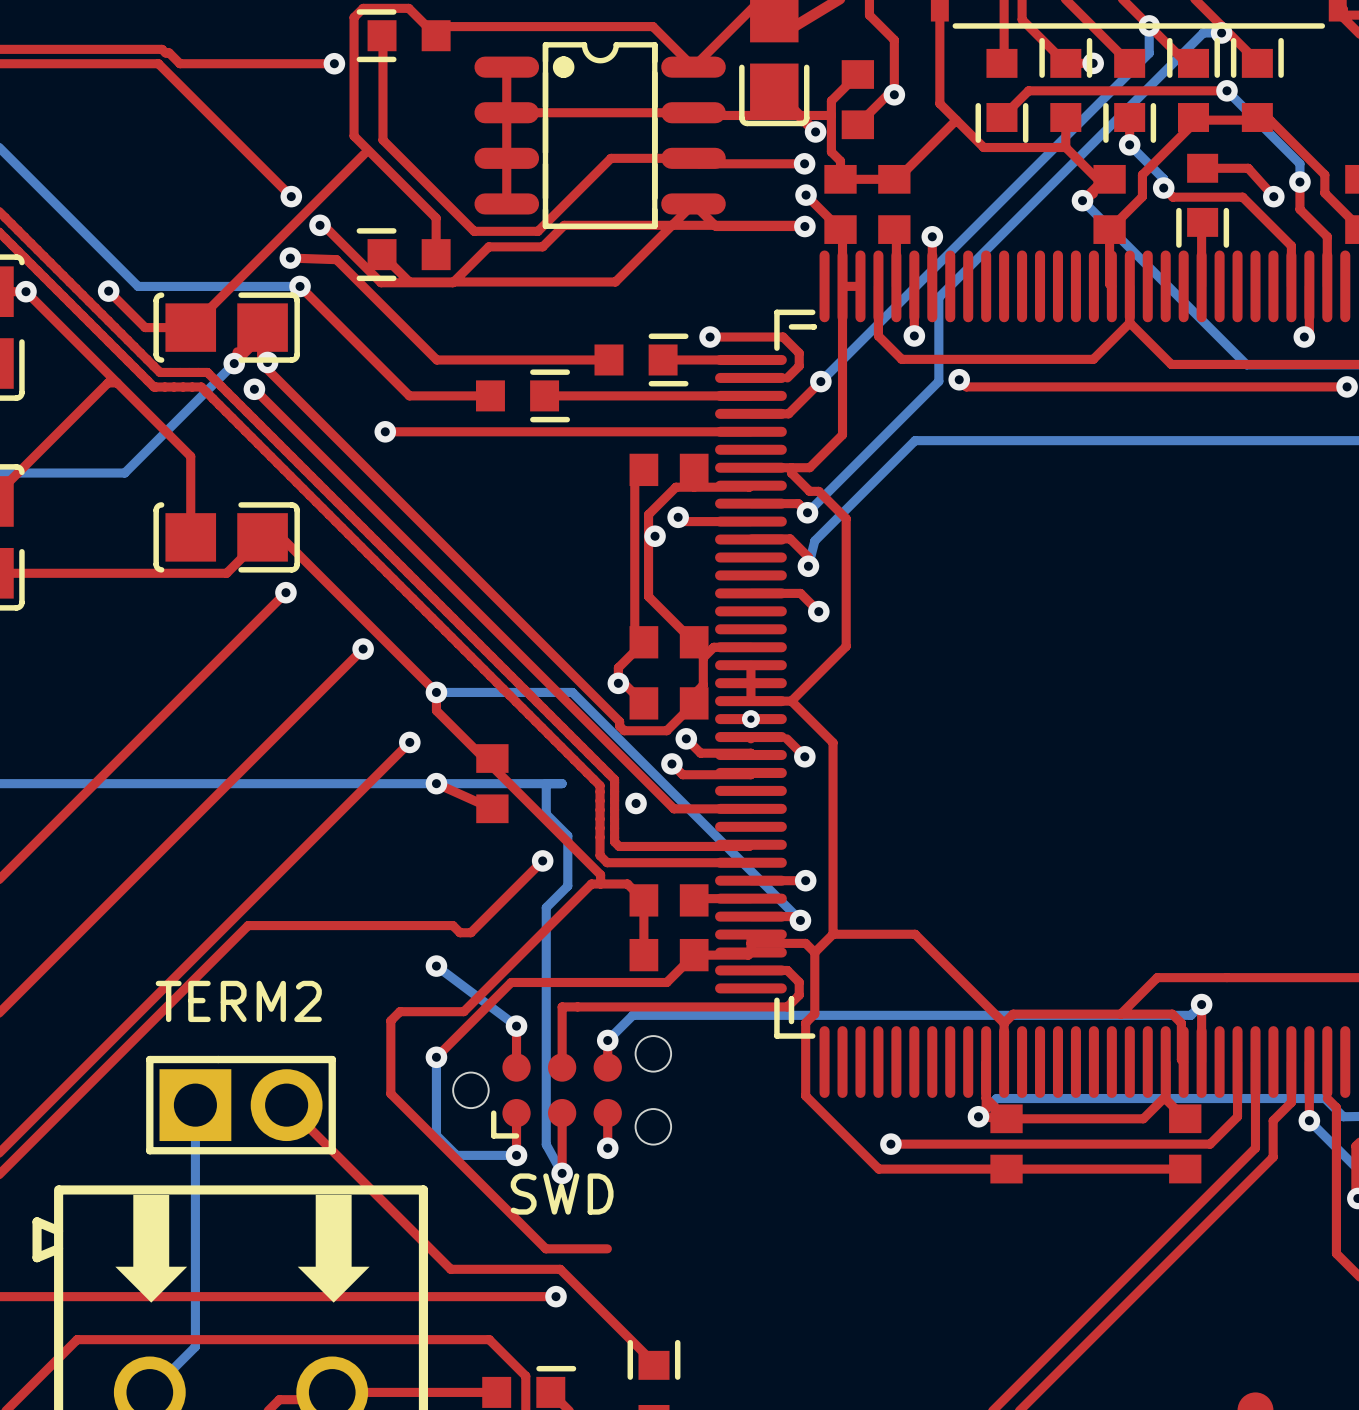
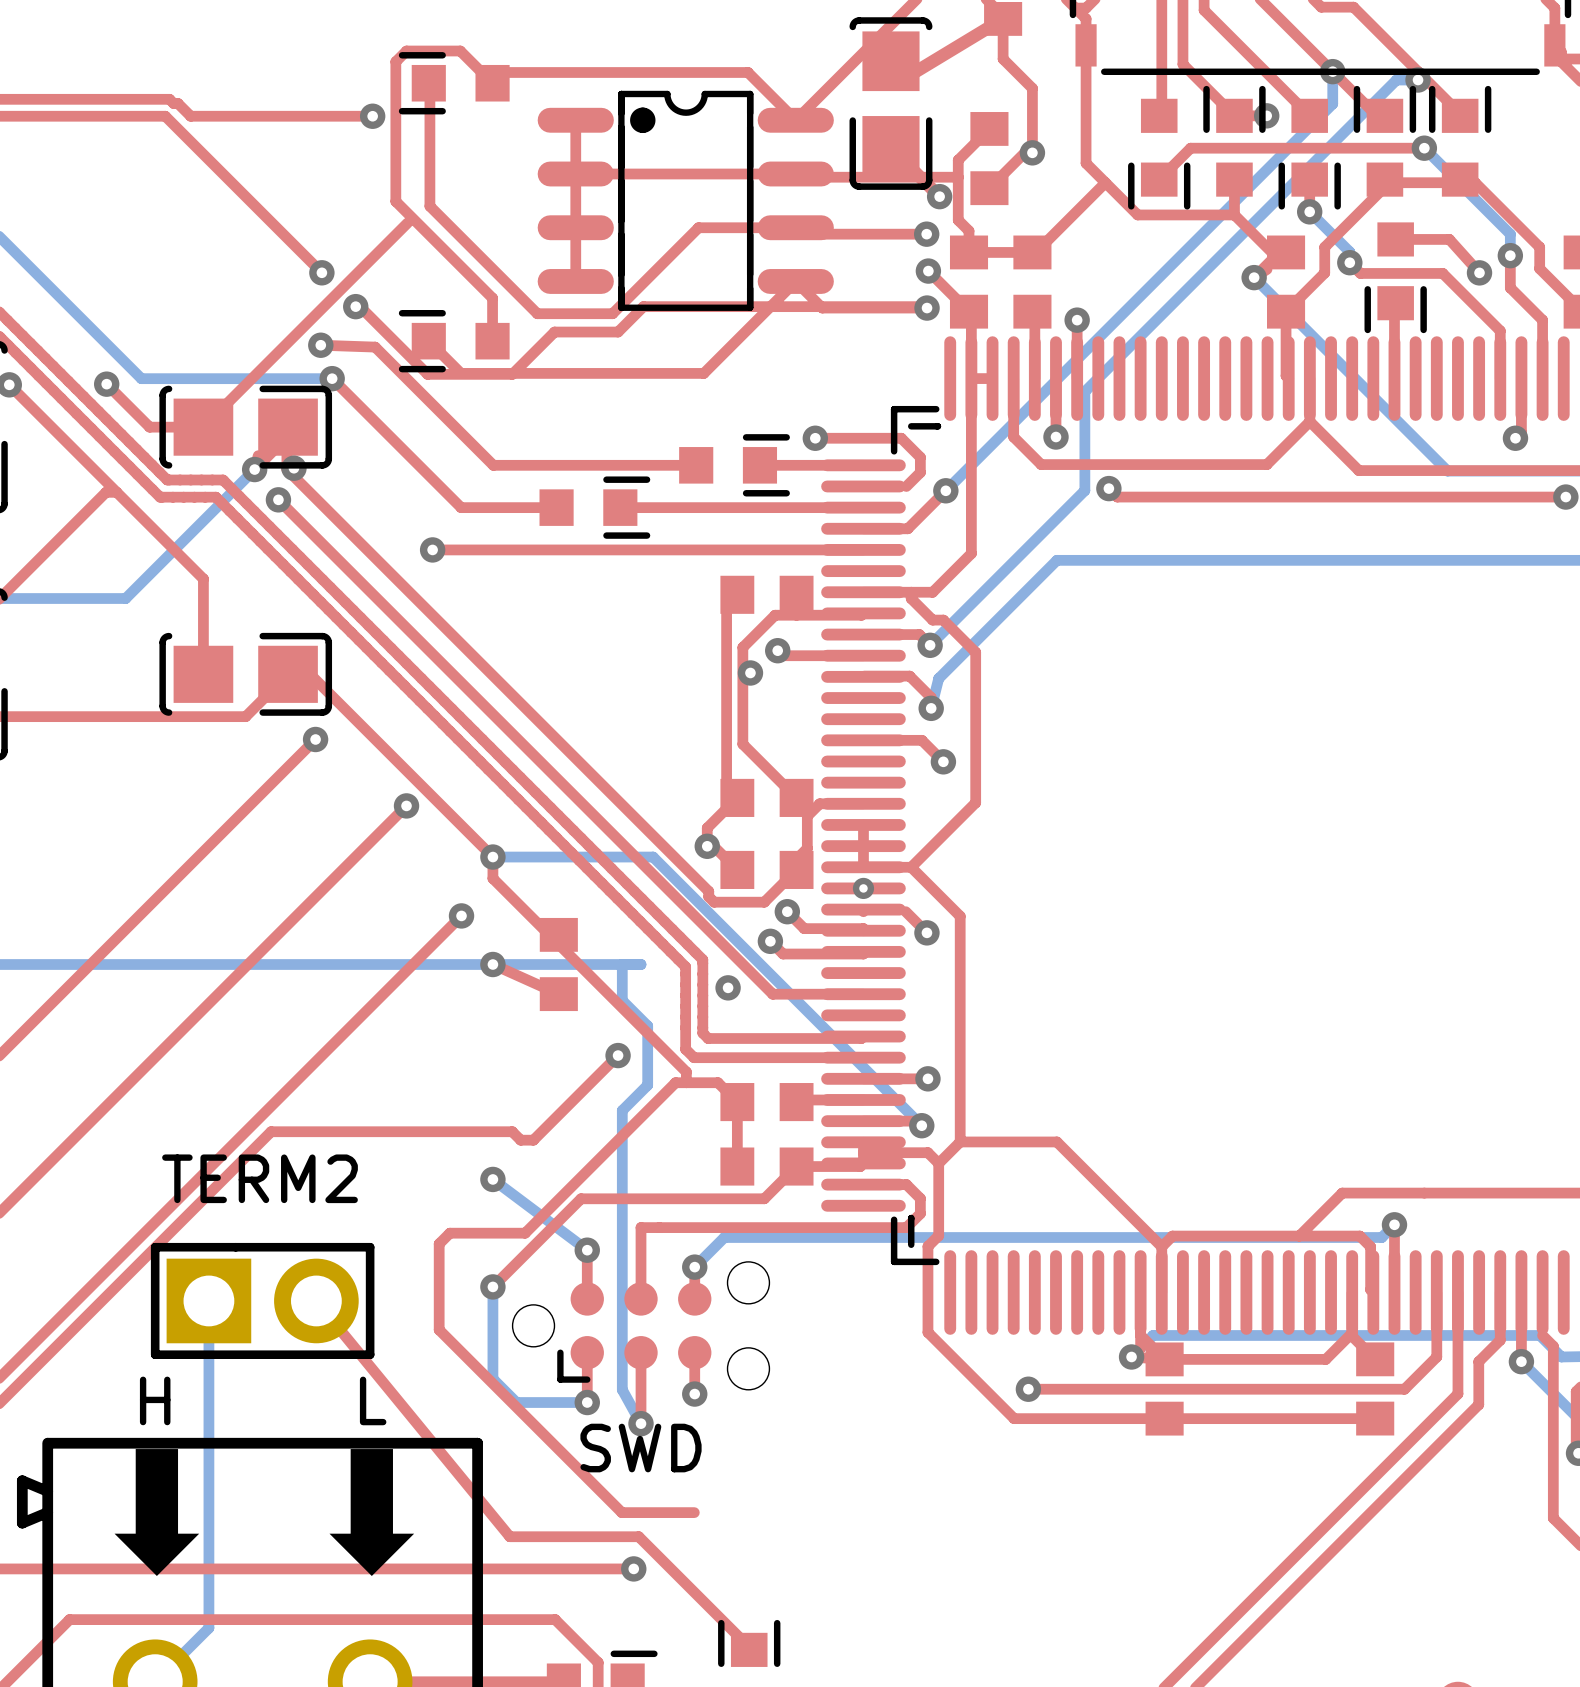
text position: TERM2 (238, 1001) -> TERM2 (260, 1178)
part position: (241, 1105) -> (262, 1300)
top track: (286, 1105) (450, 1269) -> (316, 1300) (509, 1536)
text: none -> H (155, 1400)
text: none -> L (373, 1400)

